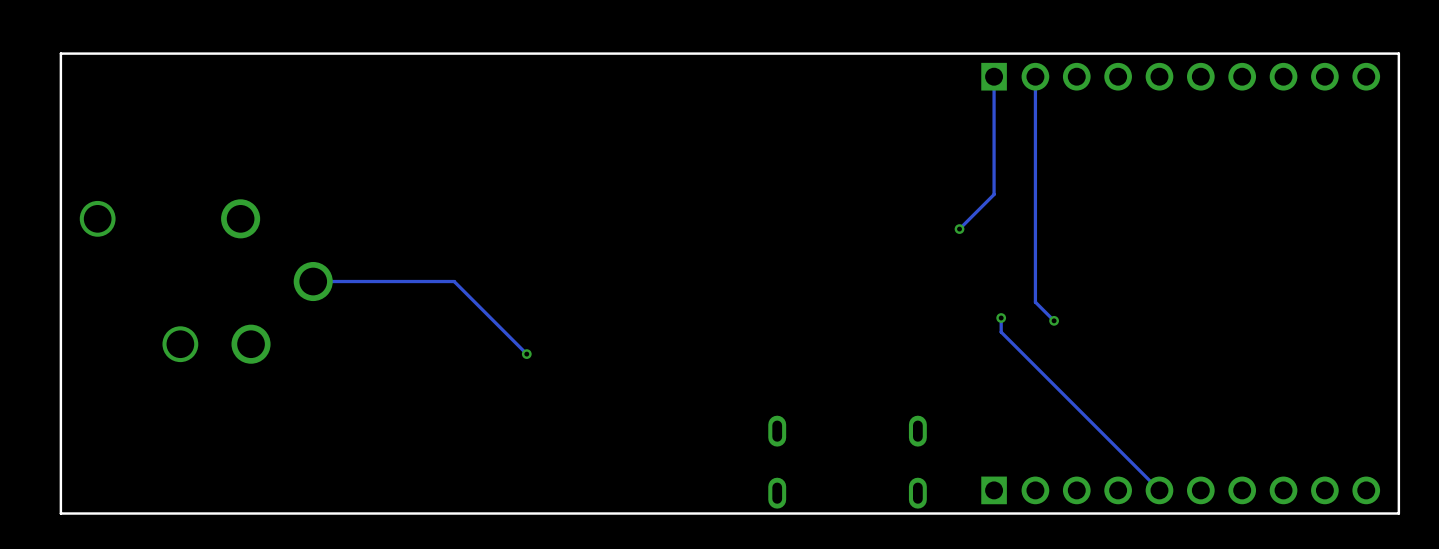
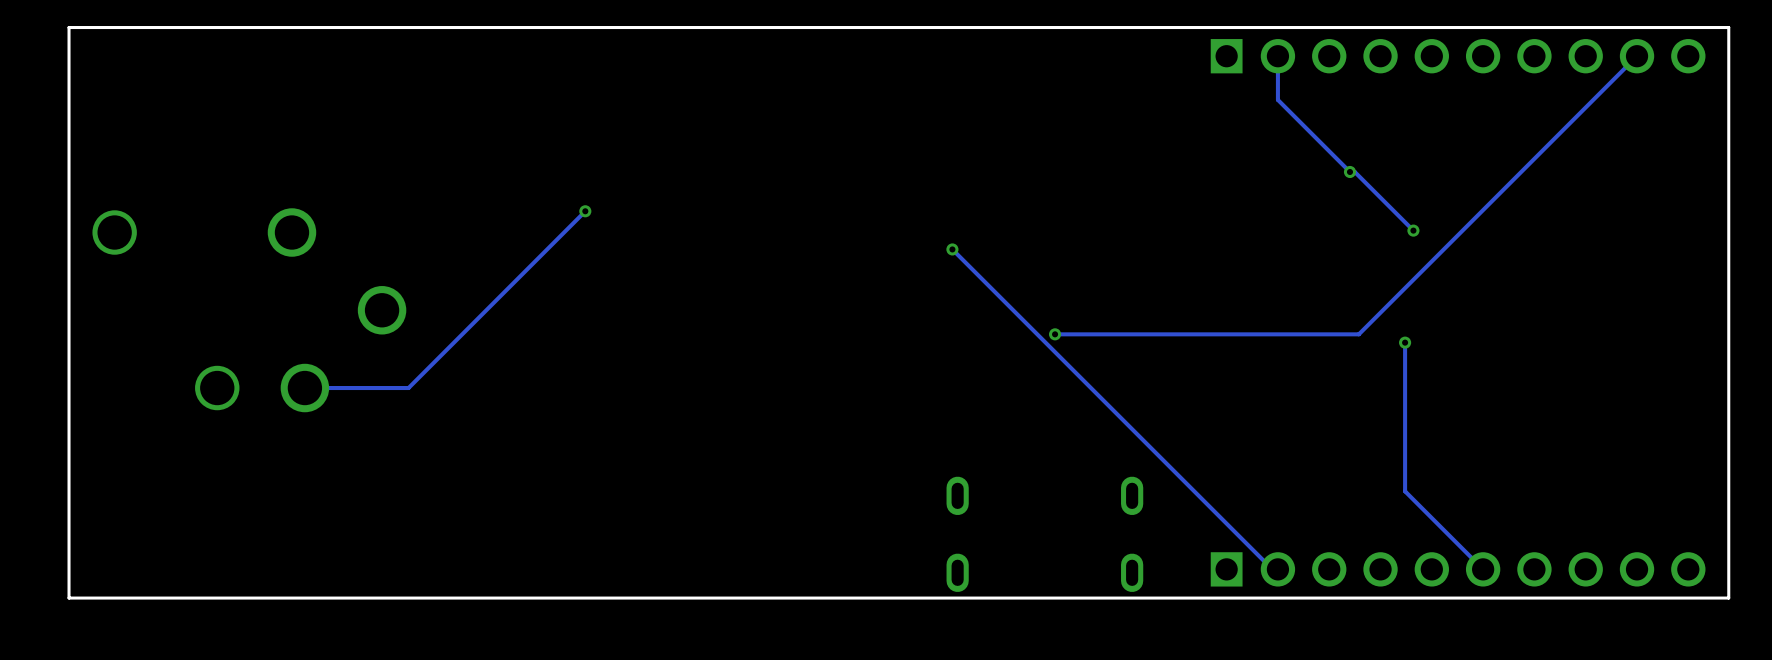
track: (994, 76) (994, 194) (959, 229) -> none
track: none -> (1637, 56) (1358, 334) (1055, 334)
track: (1035, 111) (1035, 302) (1054, 320) -> (1277, 99) (1349, 171) (1354, 171) (1413, 230)
via: none -> (1349, 171)
track: none -> (585, 211) (408, 388) (304, 388)
via: none -> (585, 211)
via: none -> (1413, 230)
via: (959, 229) -> none
track: none -> (952, 249) (1272, 569) (1277, 569)
via: none -> (952, 249)
track: (313, 281) (454, 281) (526, 354) -> none
via: none -> (1055, 334)
track: none -> (1405, 342) (1405, 491) (1483, 569)
via: none -> (1405, 342)
track: (1001, 318) (1001, 332) (1159, 490) -> none
via: (1001, 318) -> none
via: (1054, 320) -> none
via: (526, 354) -> none

